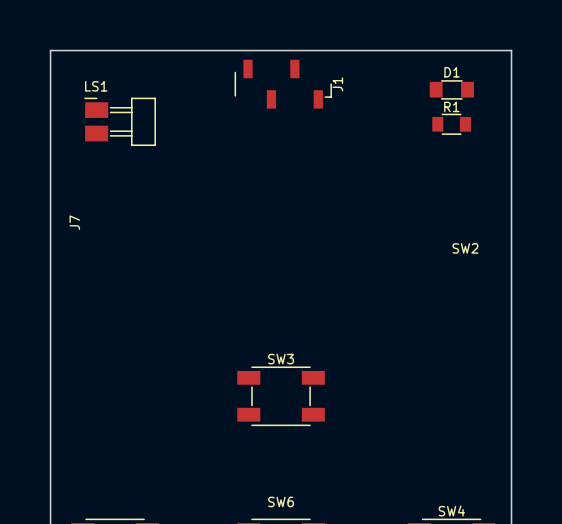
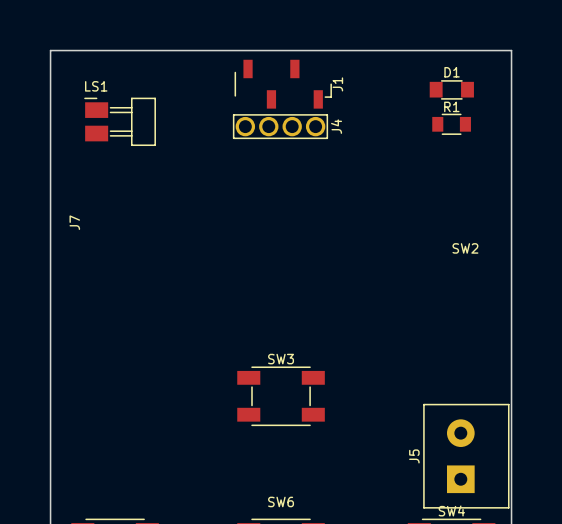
J4: none -> (280, 126)
J5: none -> (466, 456)

